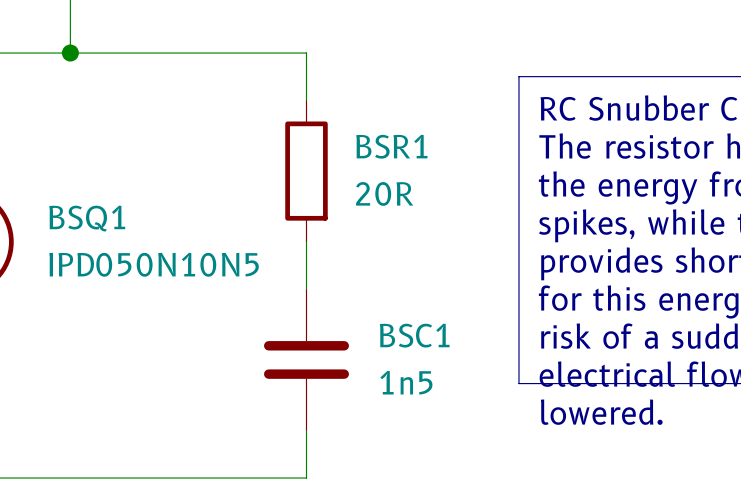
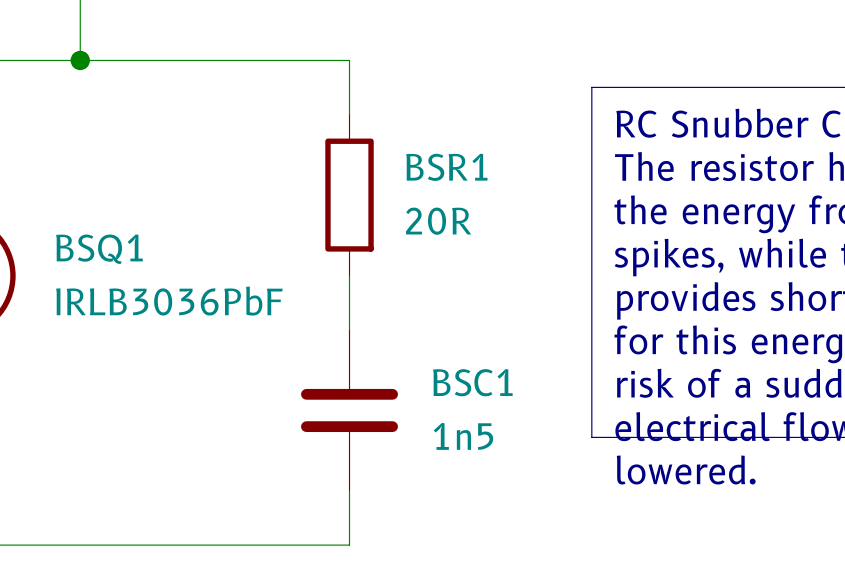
BSQ1 value: IPD050N10N5 (154, 264) -> IRLB3036PbF (169, 301)

